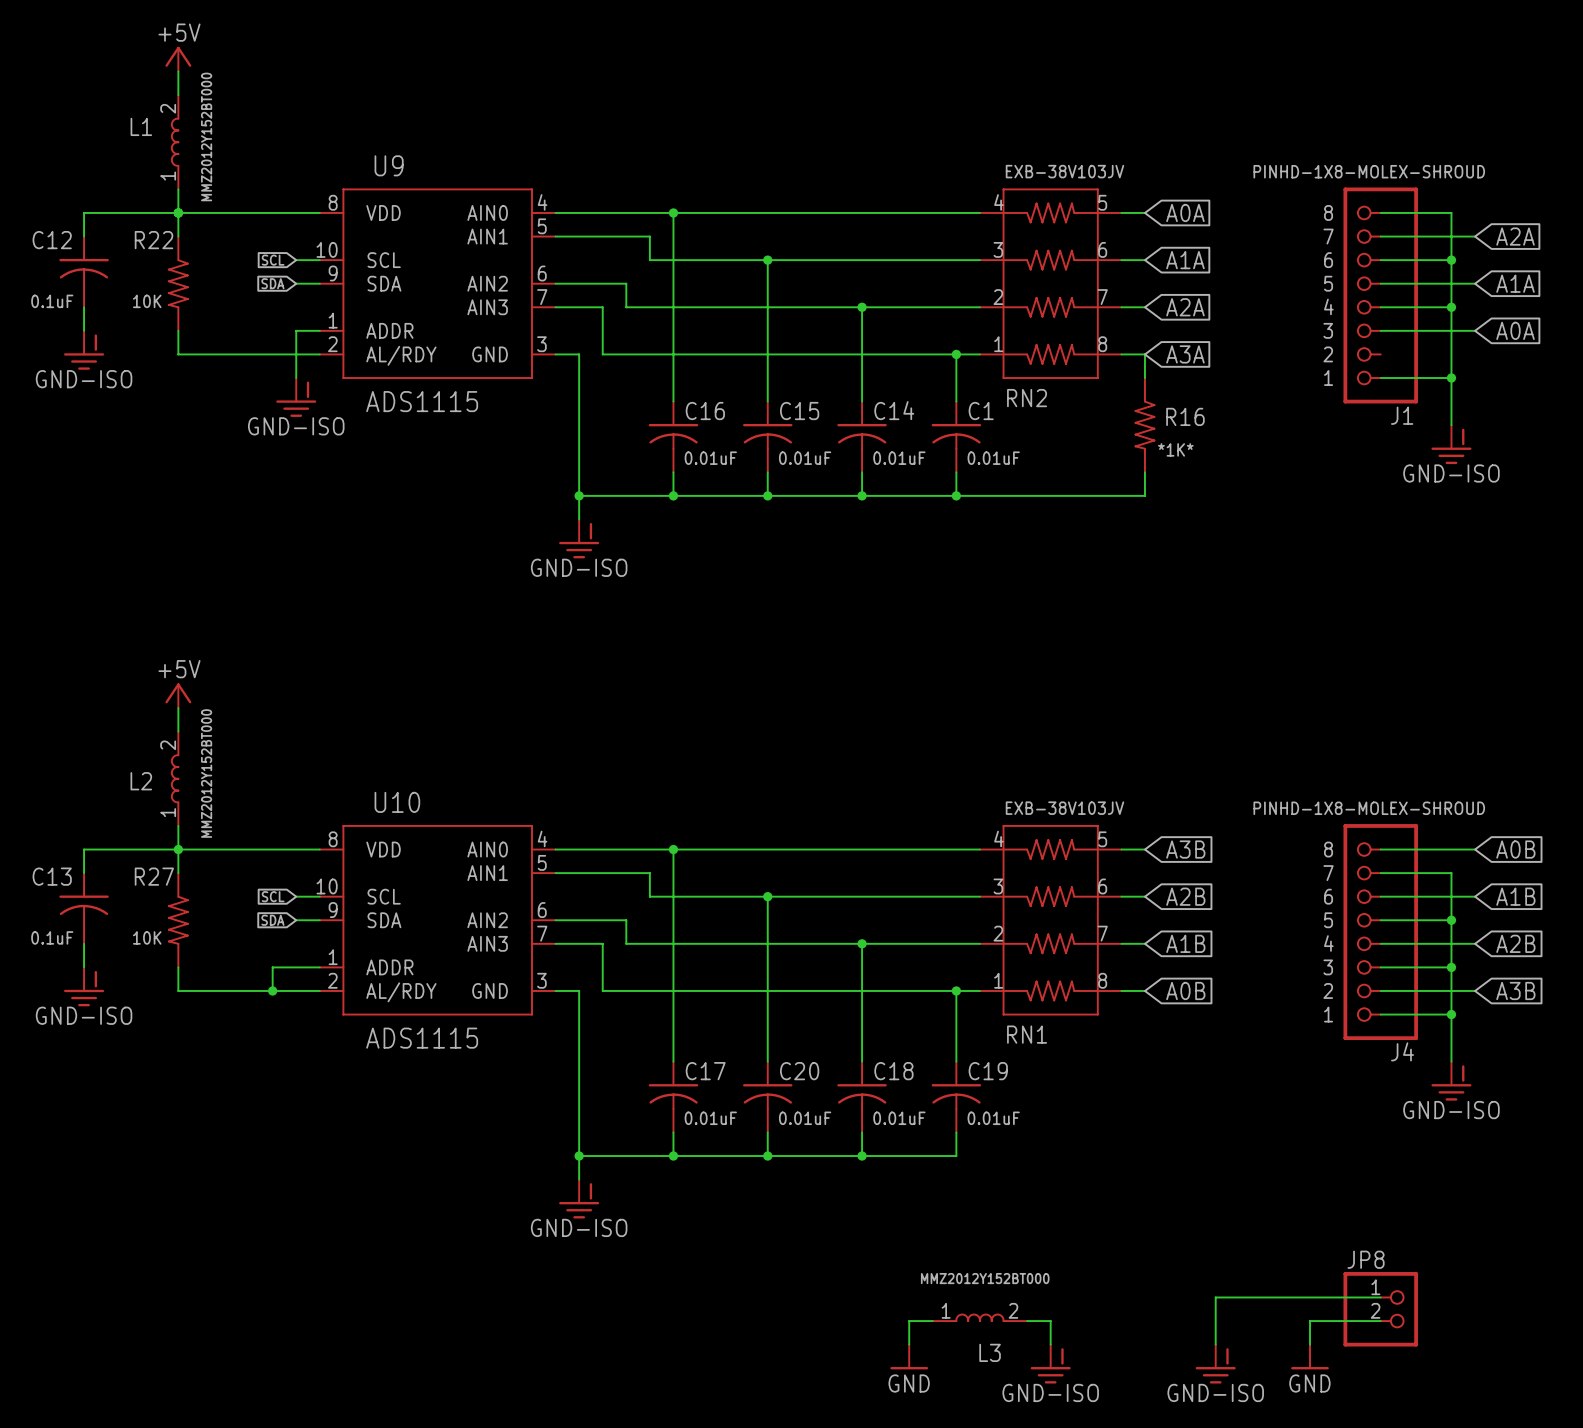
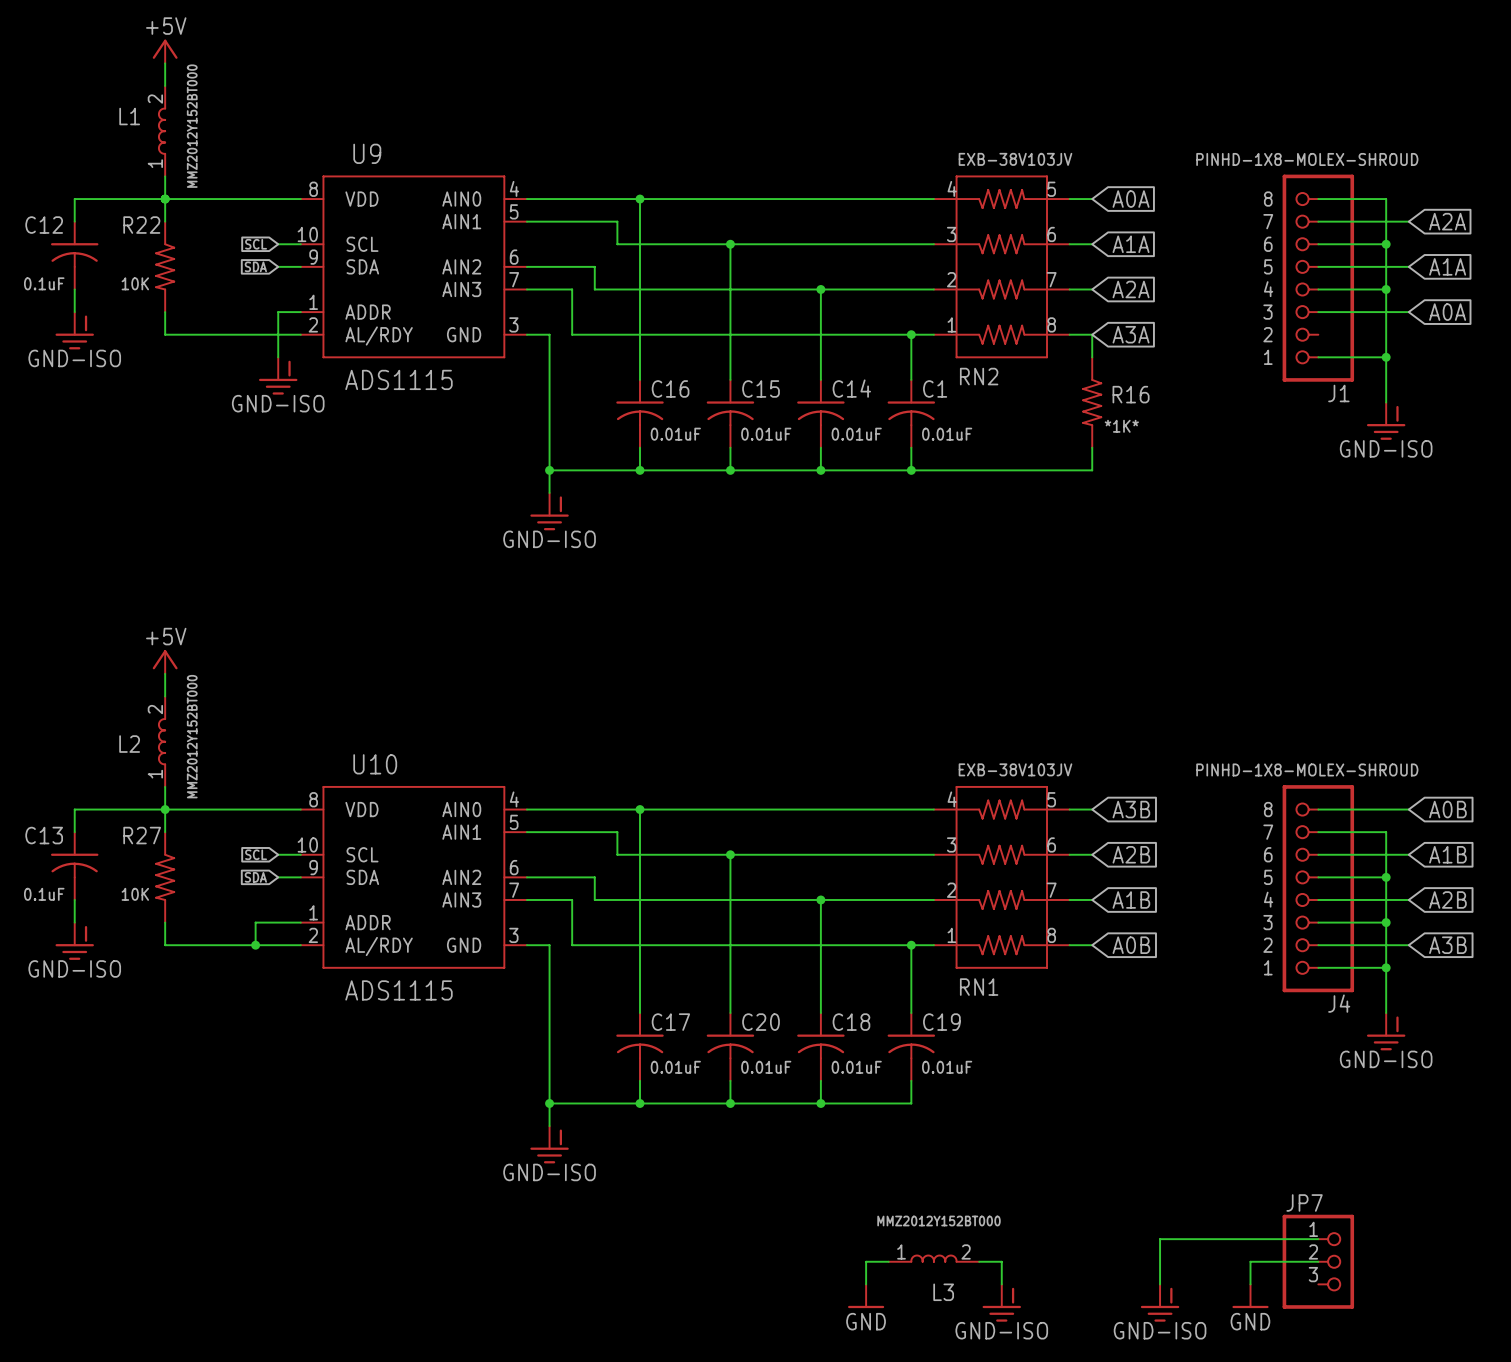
JP8: (1380, 1309) -> none
JP7: none -> (1318, 1261)

